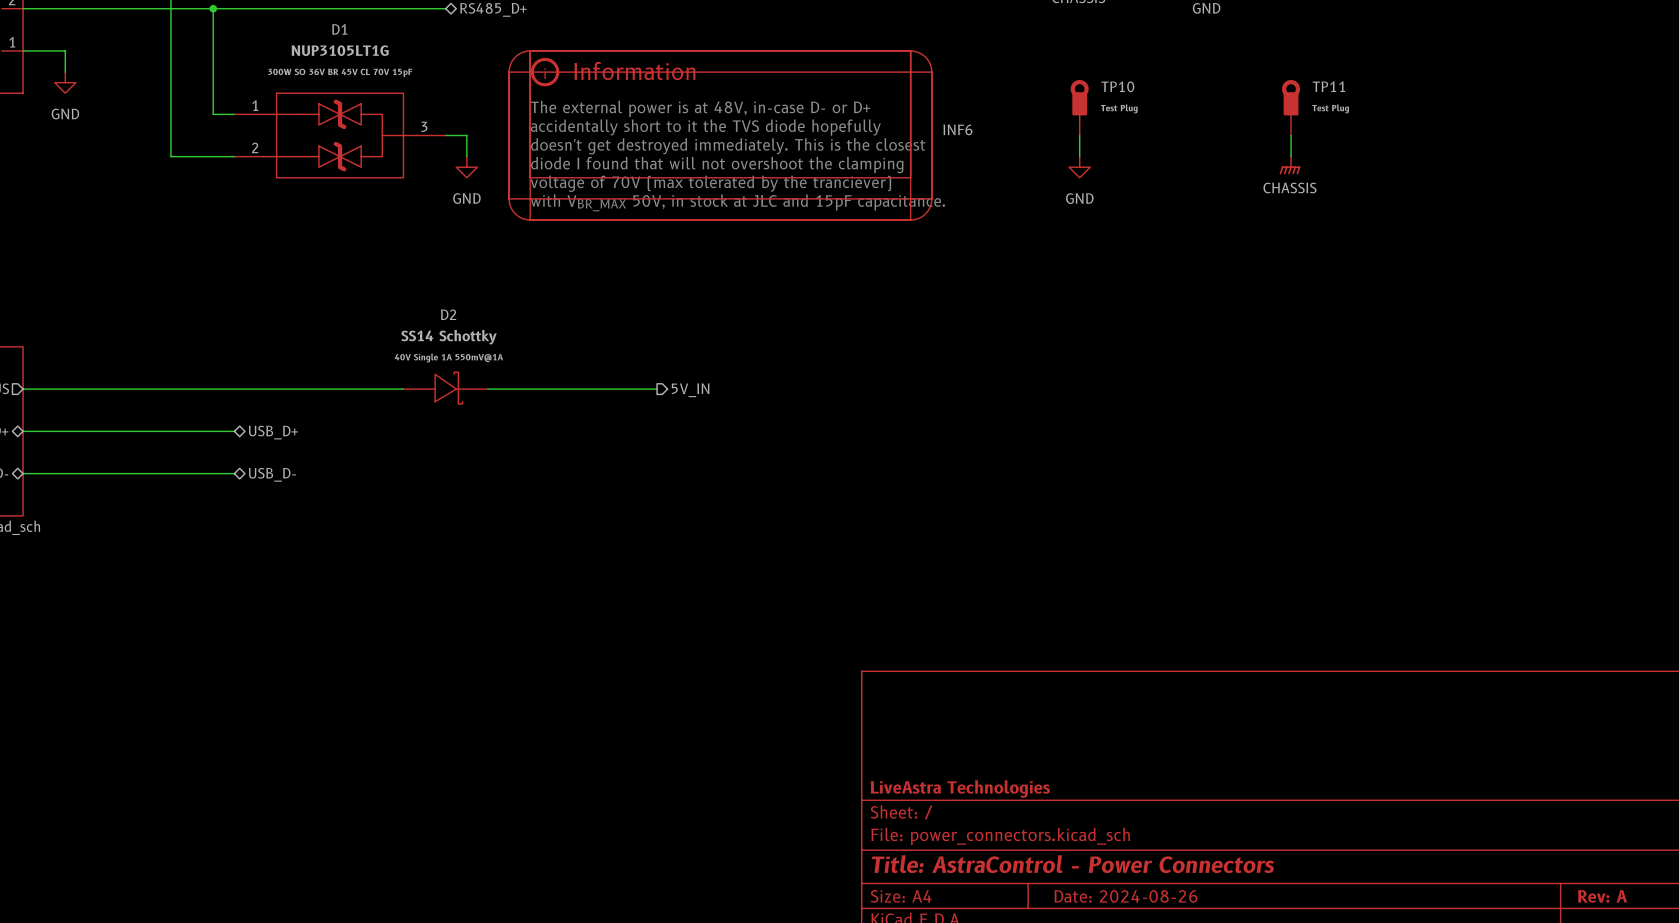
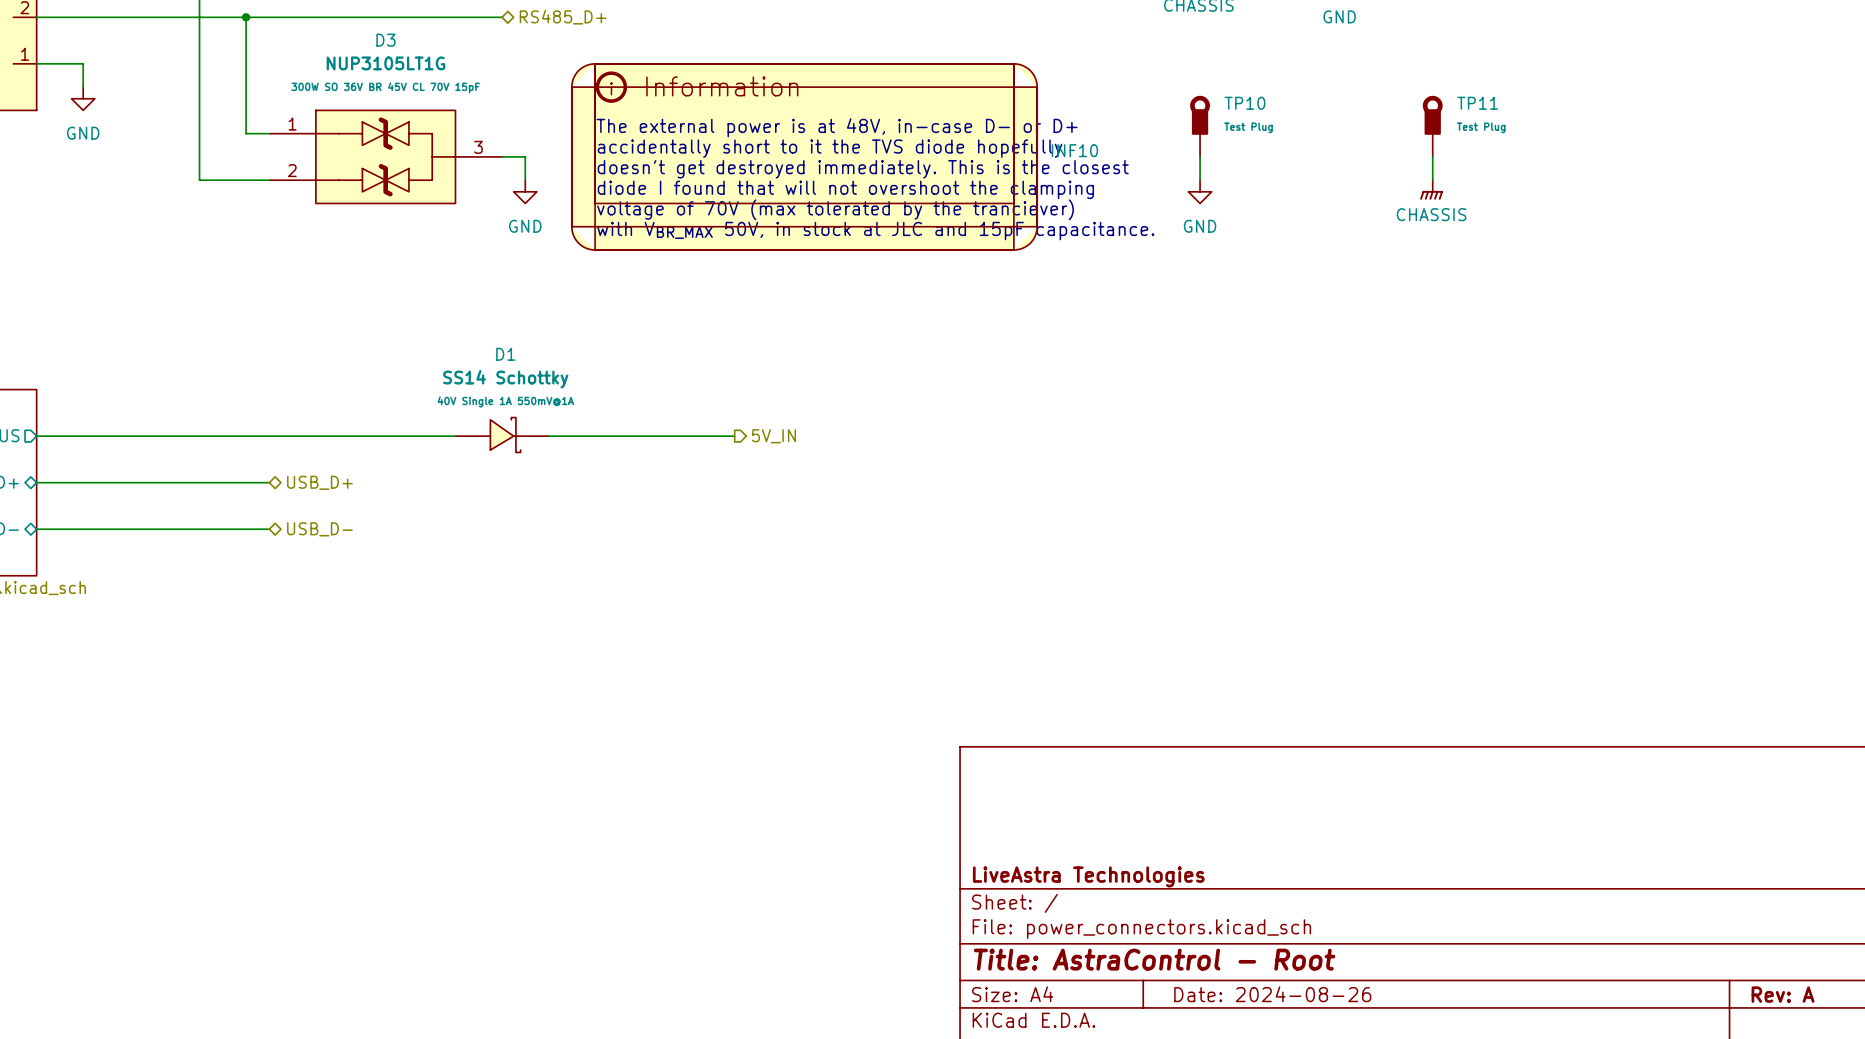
D1 name: D1 (339, 29) -> D3 (385, 40)
INF6 name: INF6 (957, 129) -> INF10 (1074, 150)
D2 name: D2 (448, 314) -> D1 (505, 354)
title block: Title: AstraControl - Power Connectors (1072, 864) -> Title: AstraControl - Root (1154, 959)

